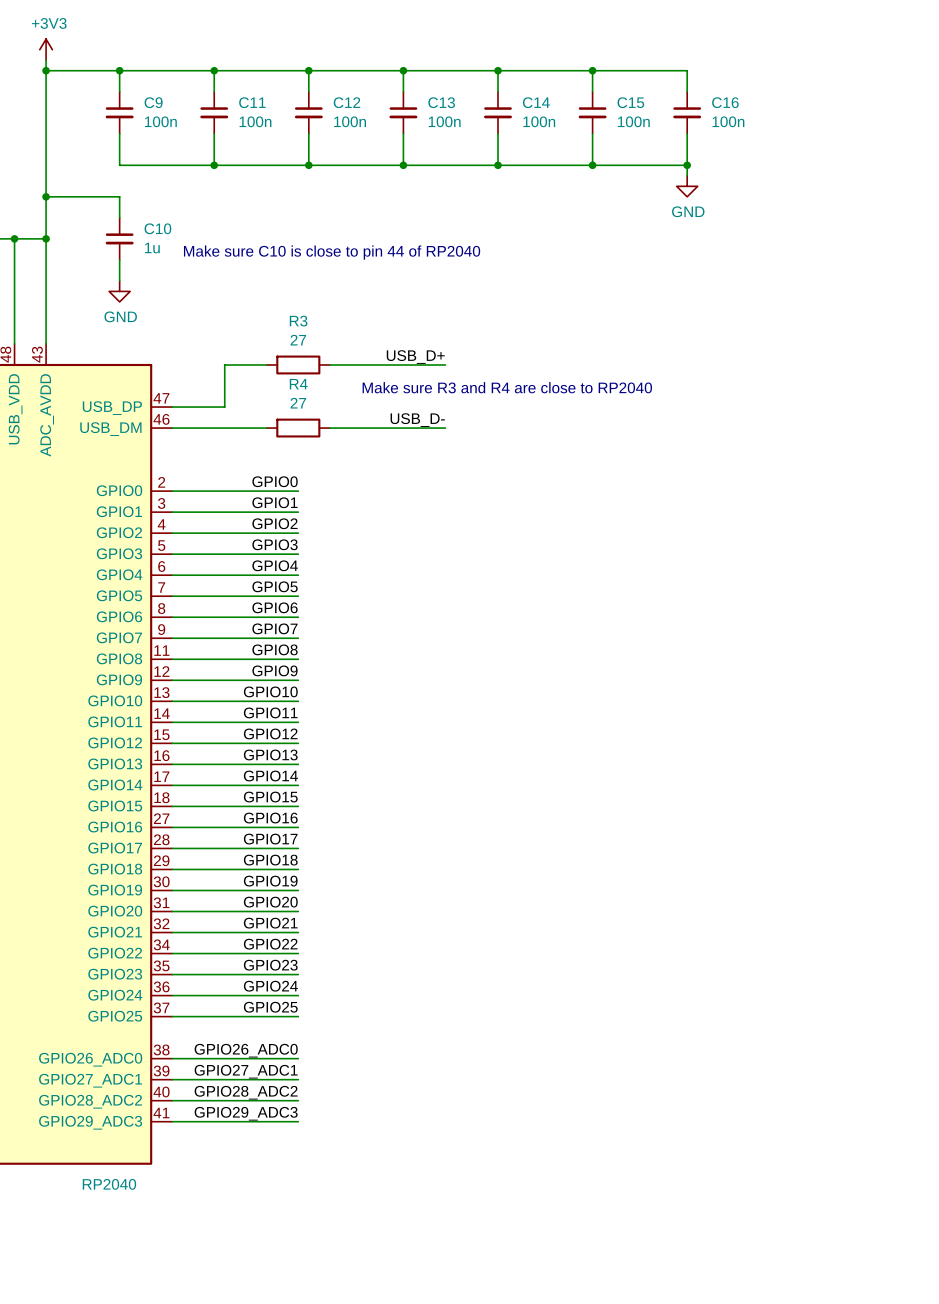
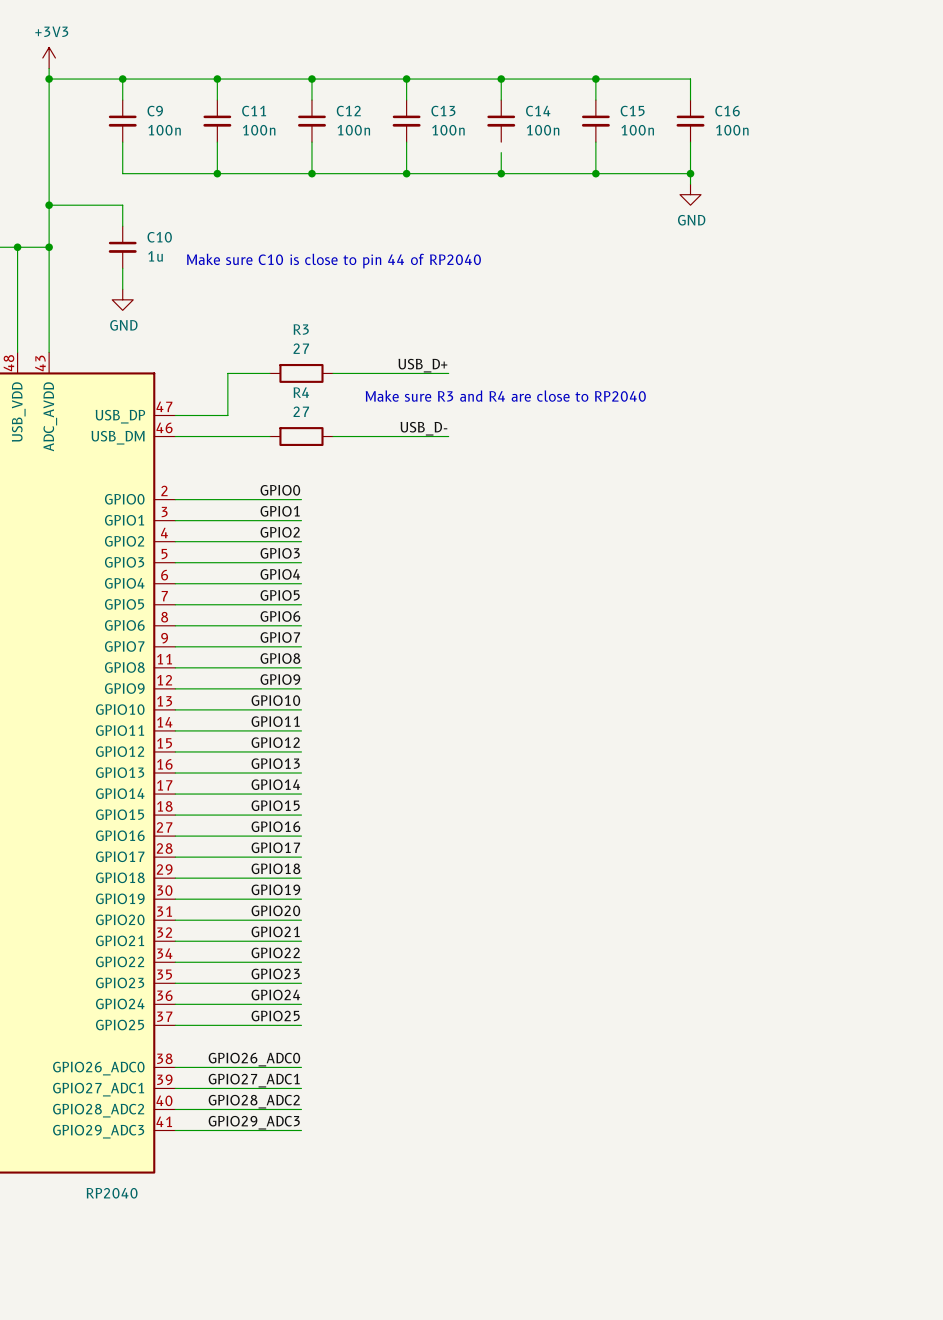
wire: (498, 133) (498, 144) -> none

